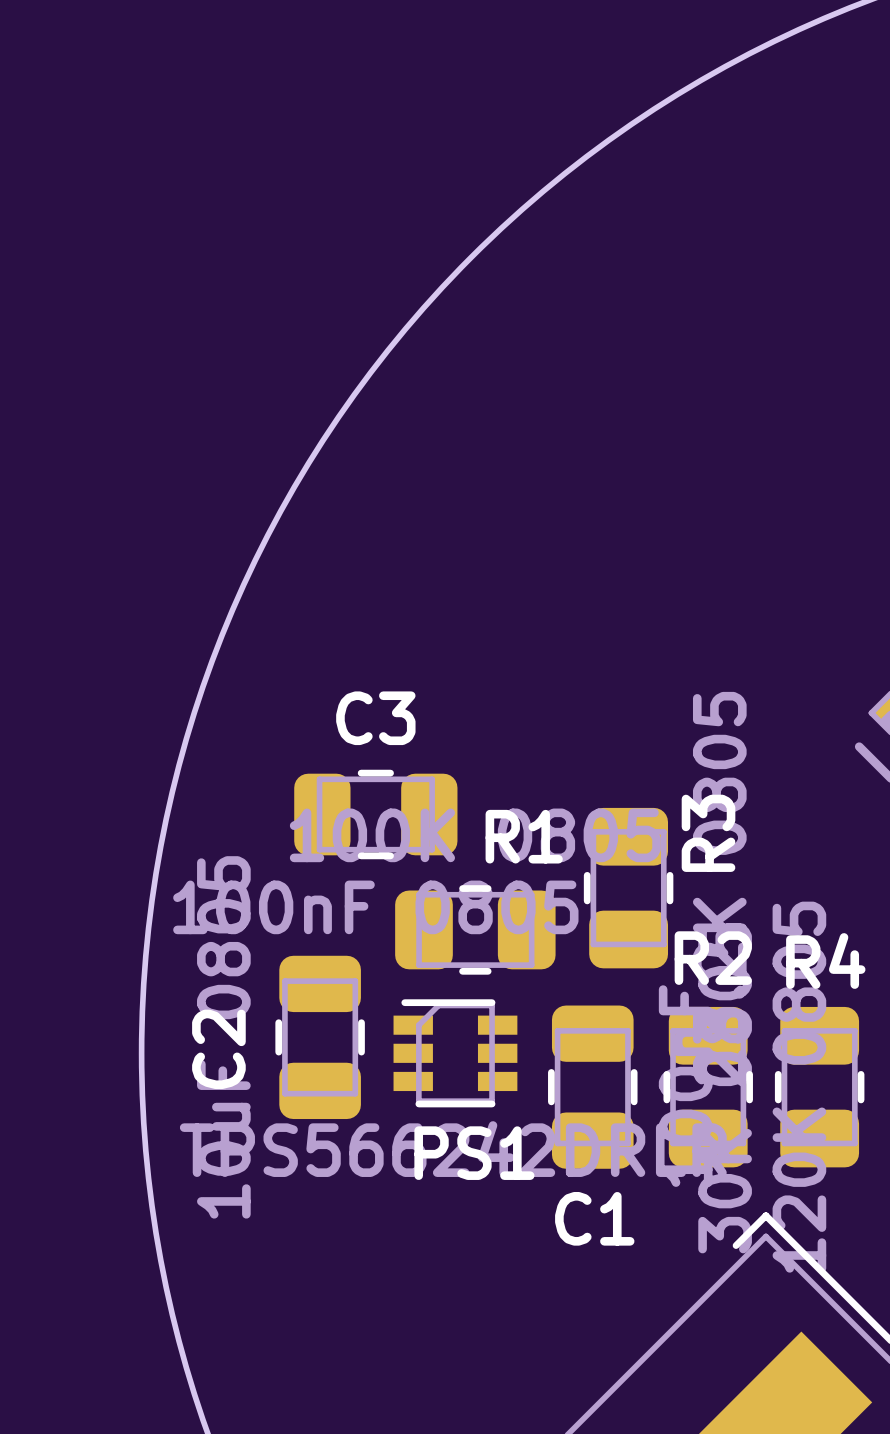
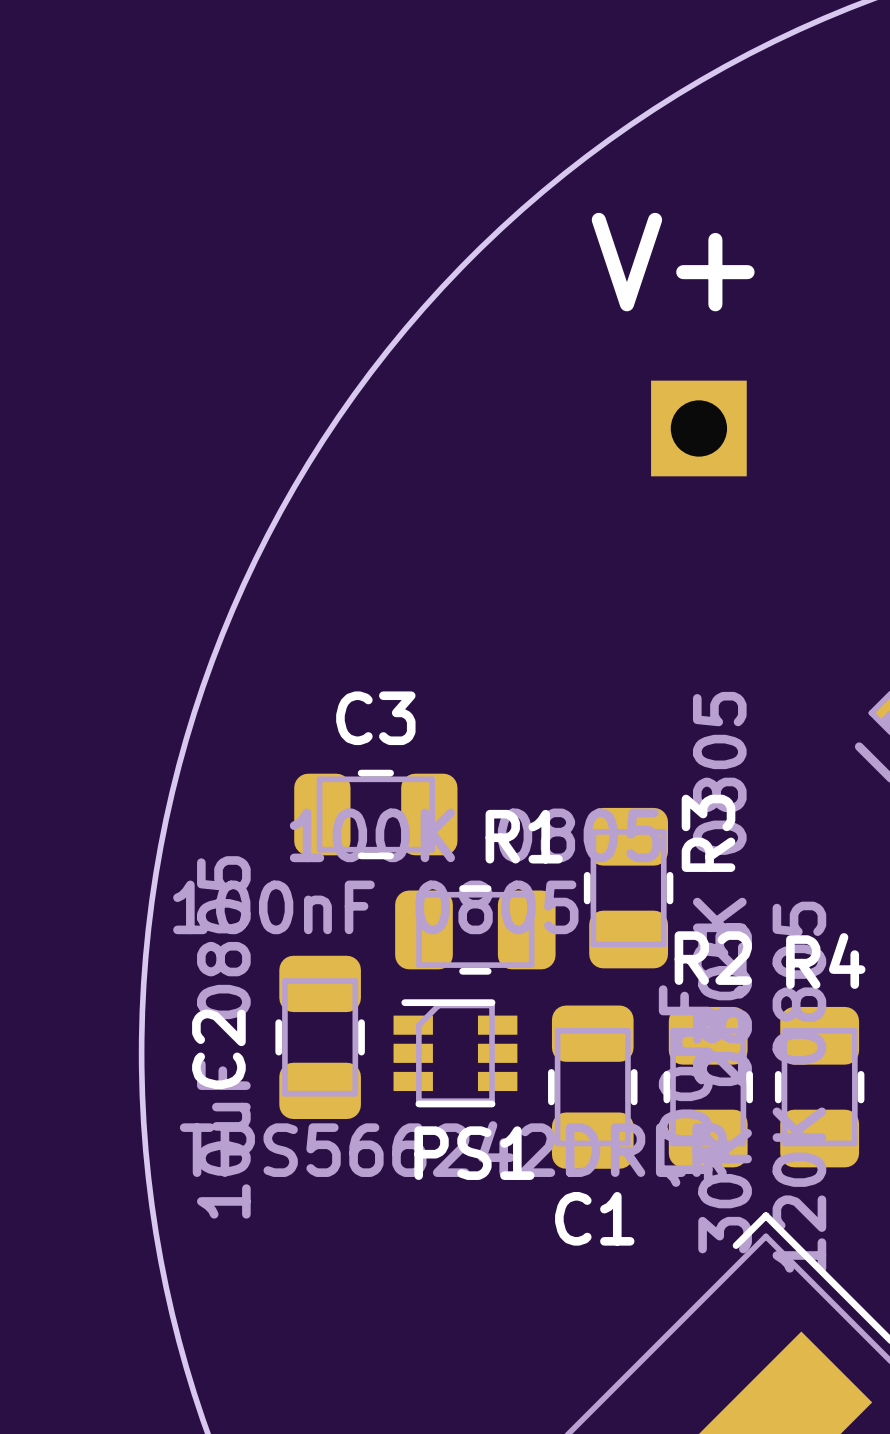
text: none -> V+ (673, 262)
part: none -> (698, 428)

